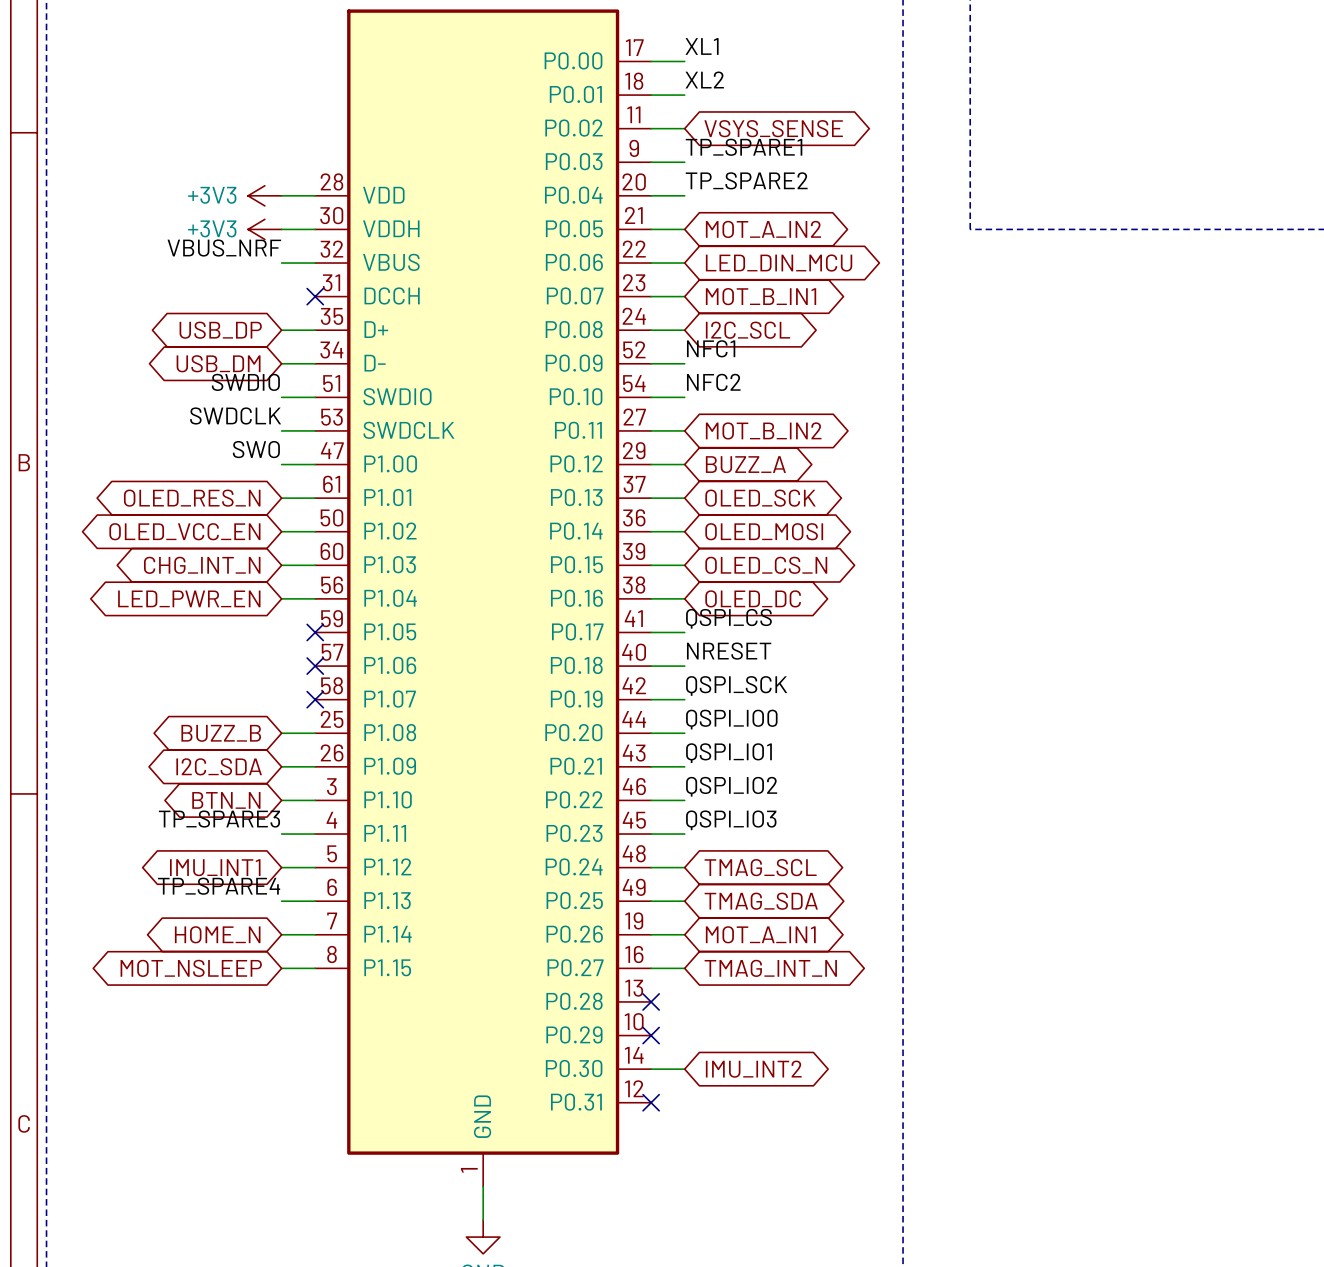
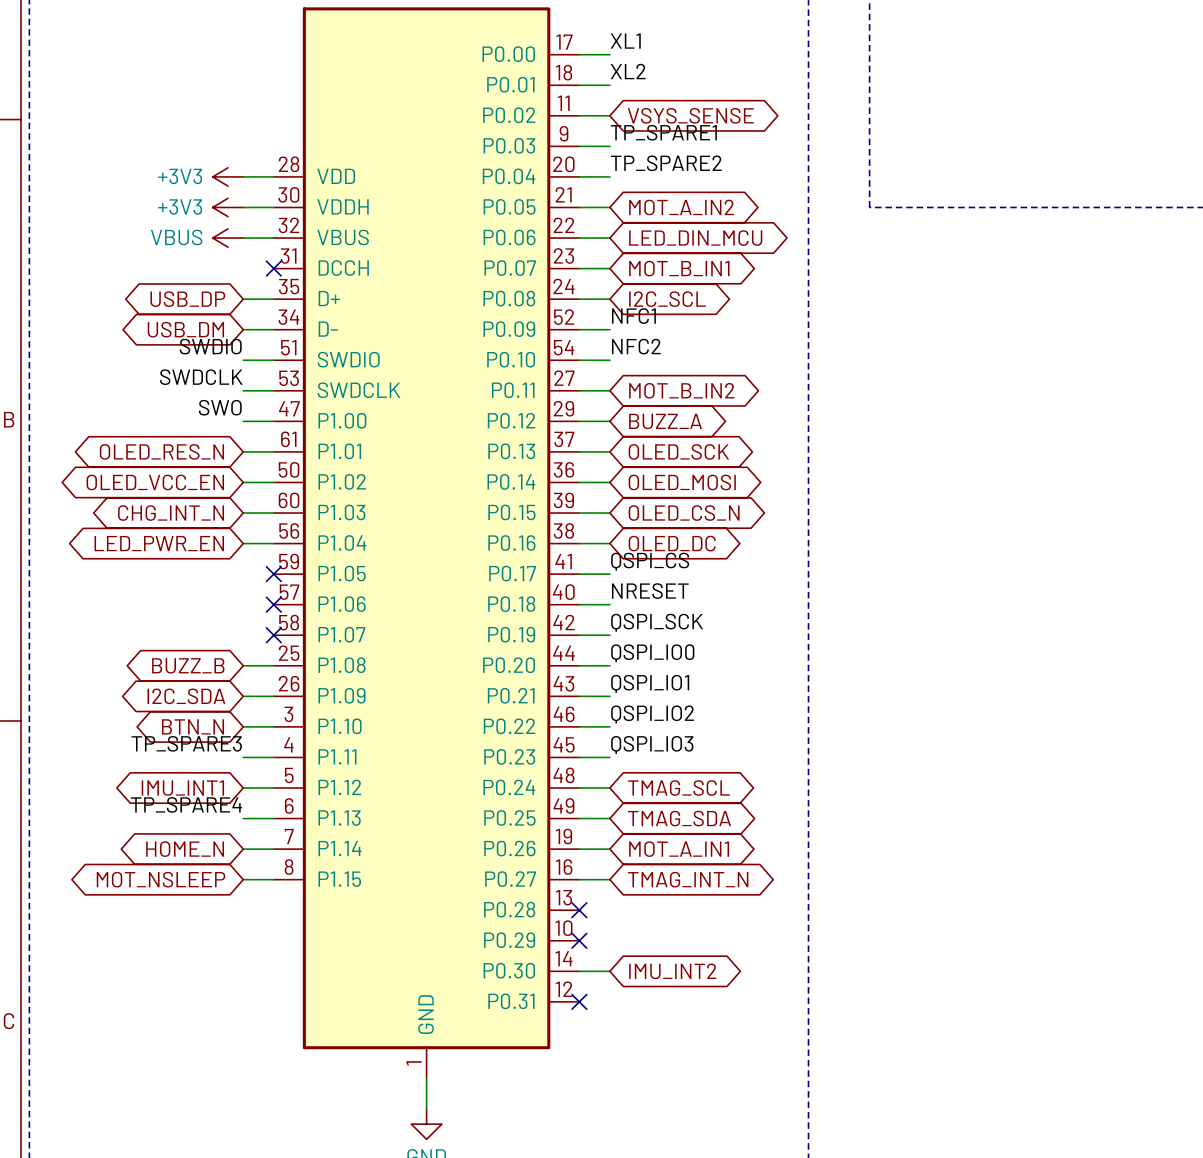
label: VBUS_NRF (224, 248) -> none
power symbol: none -> VBUS (227, 238)

